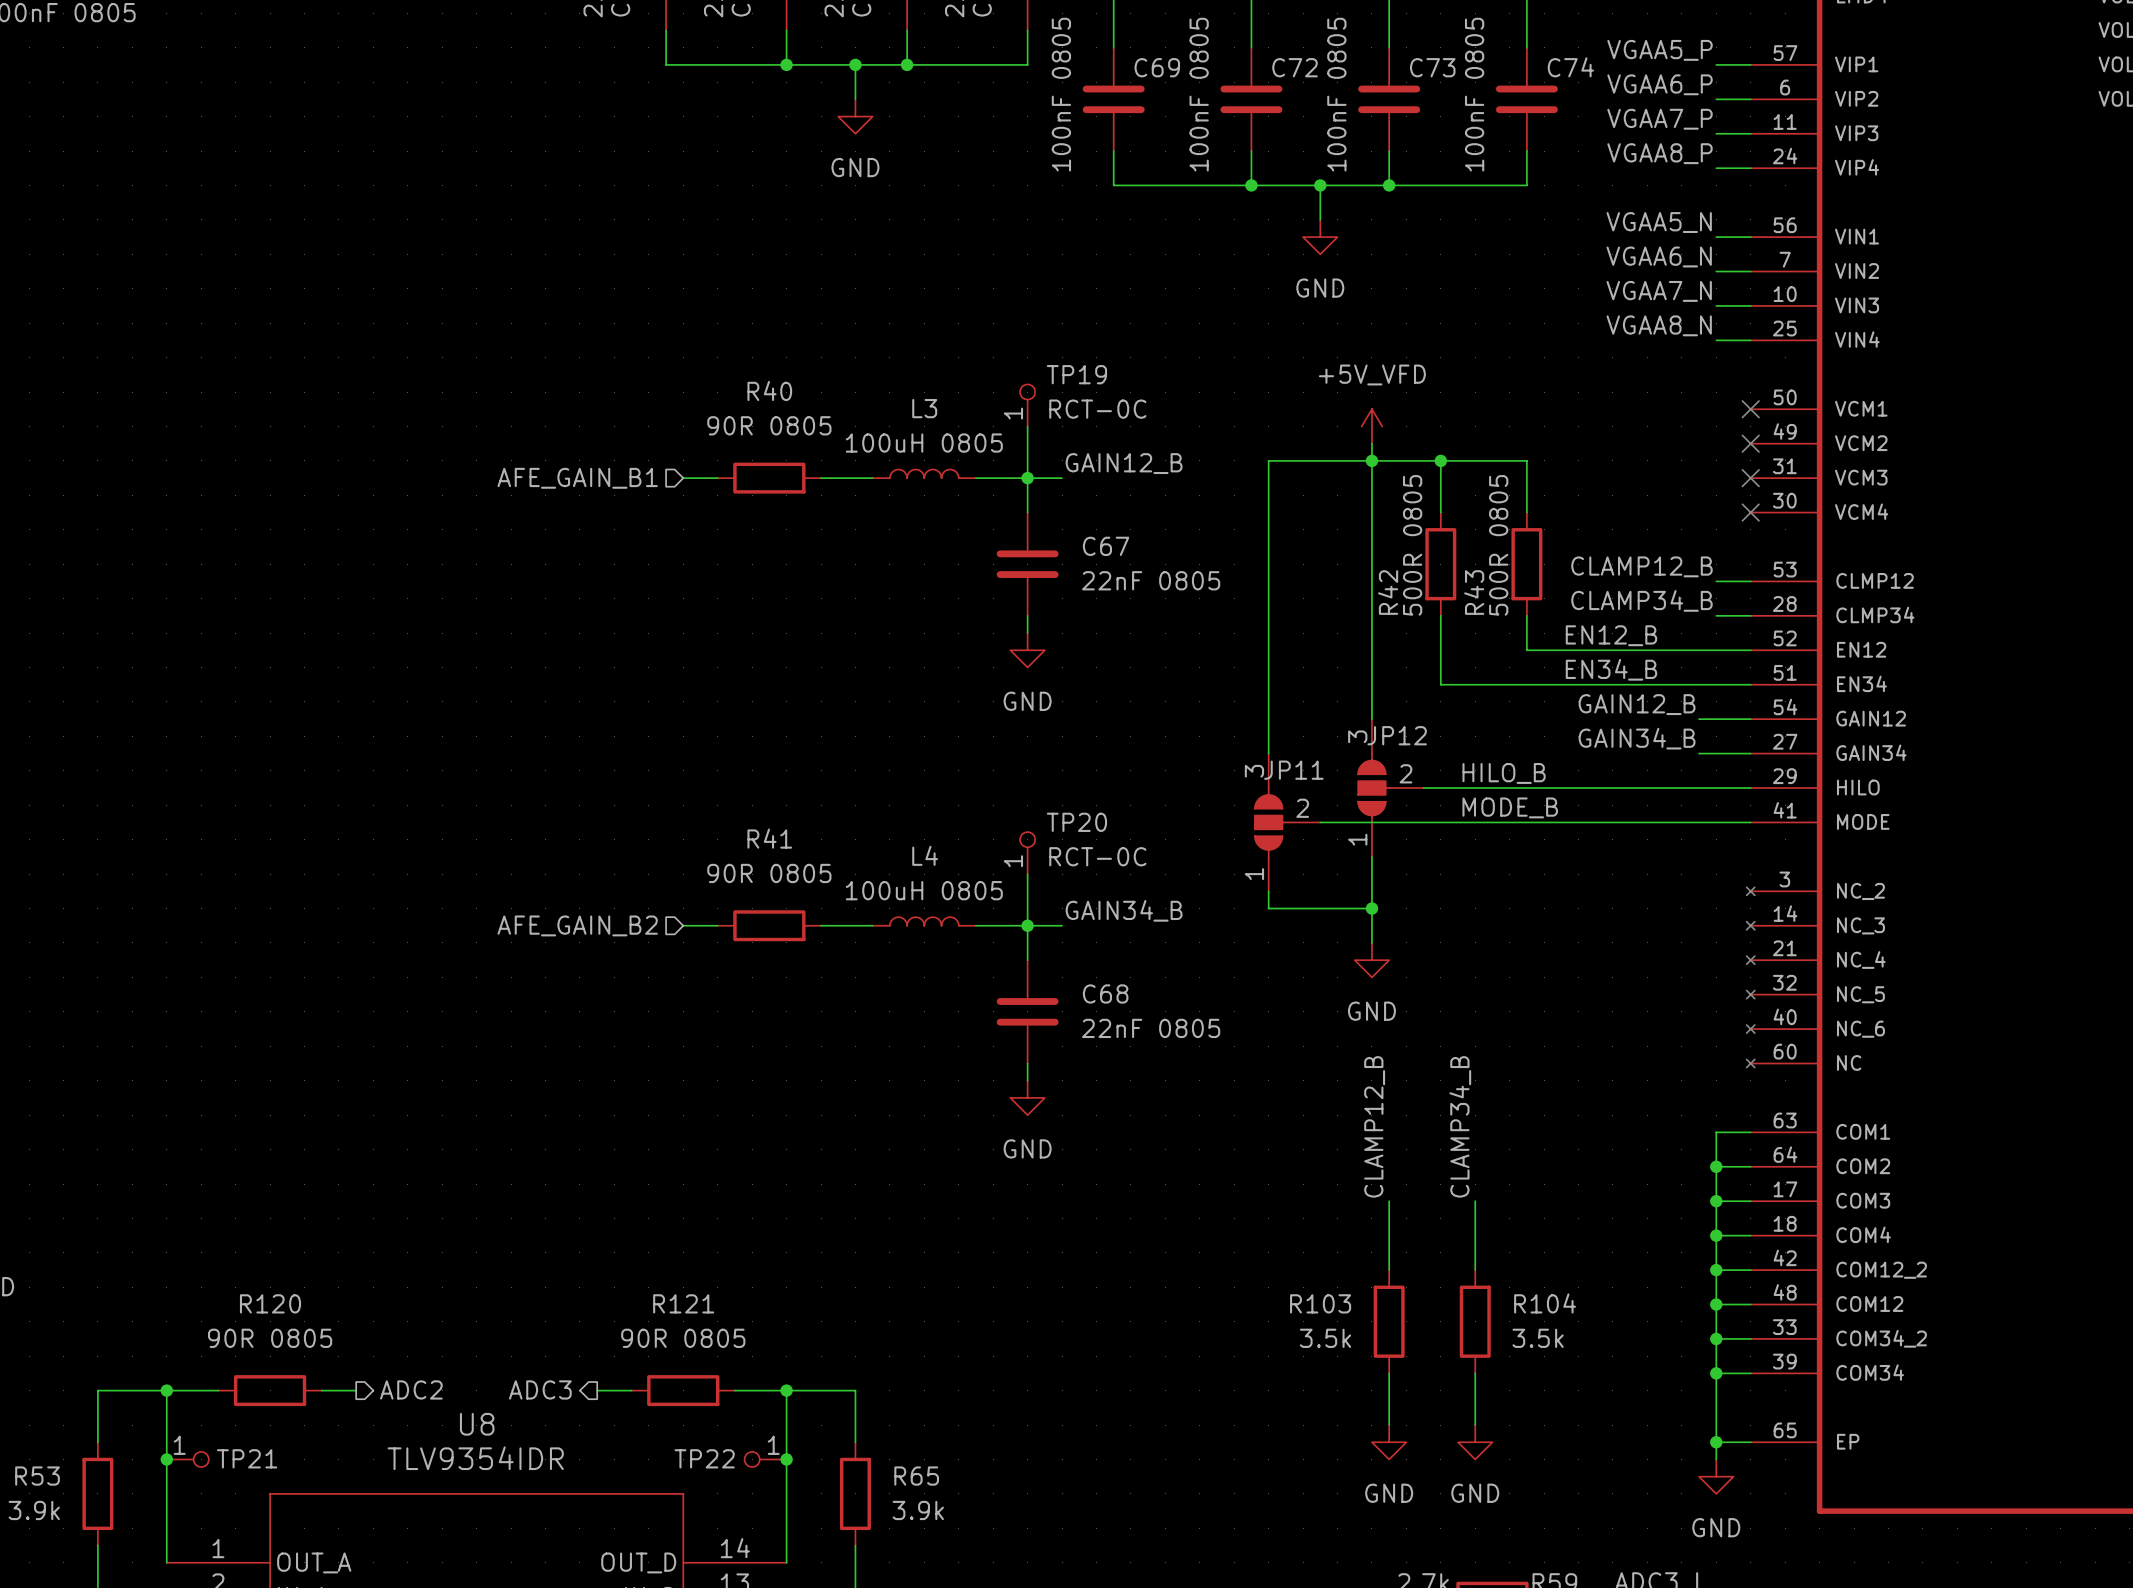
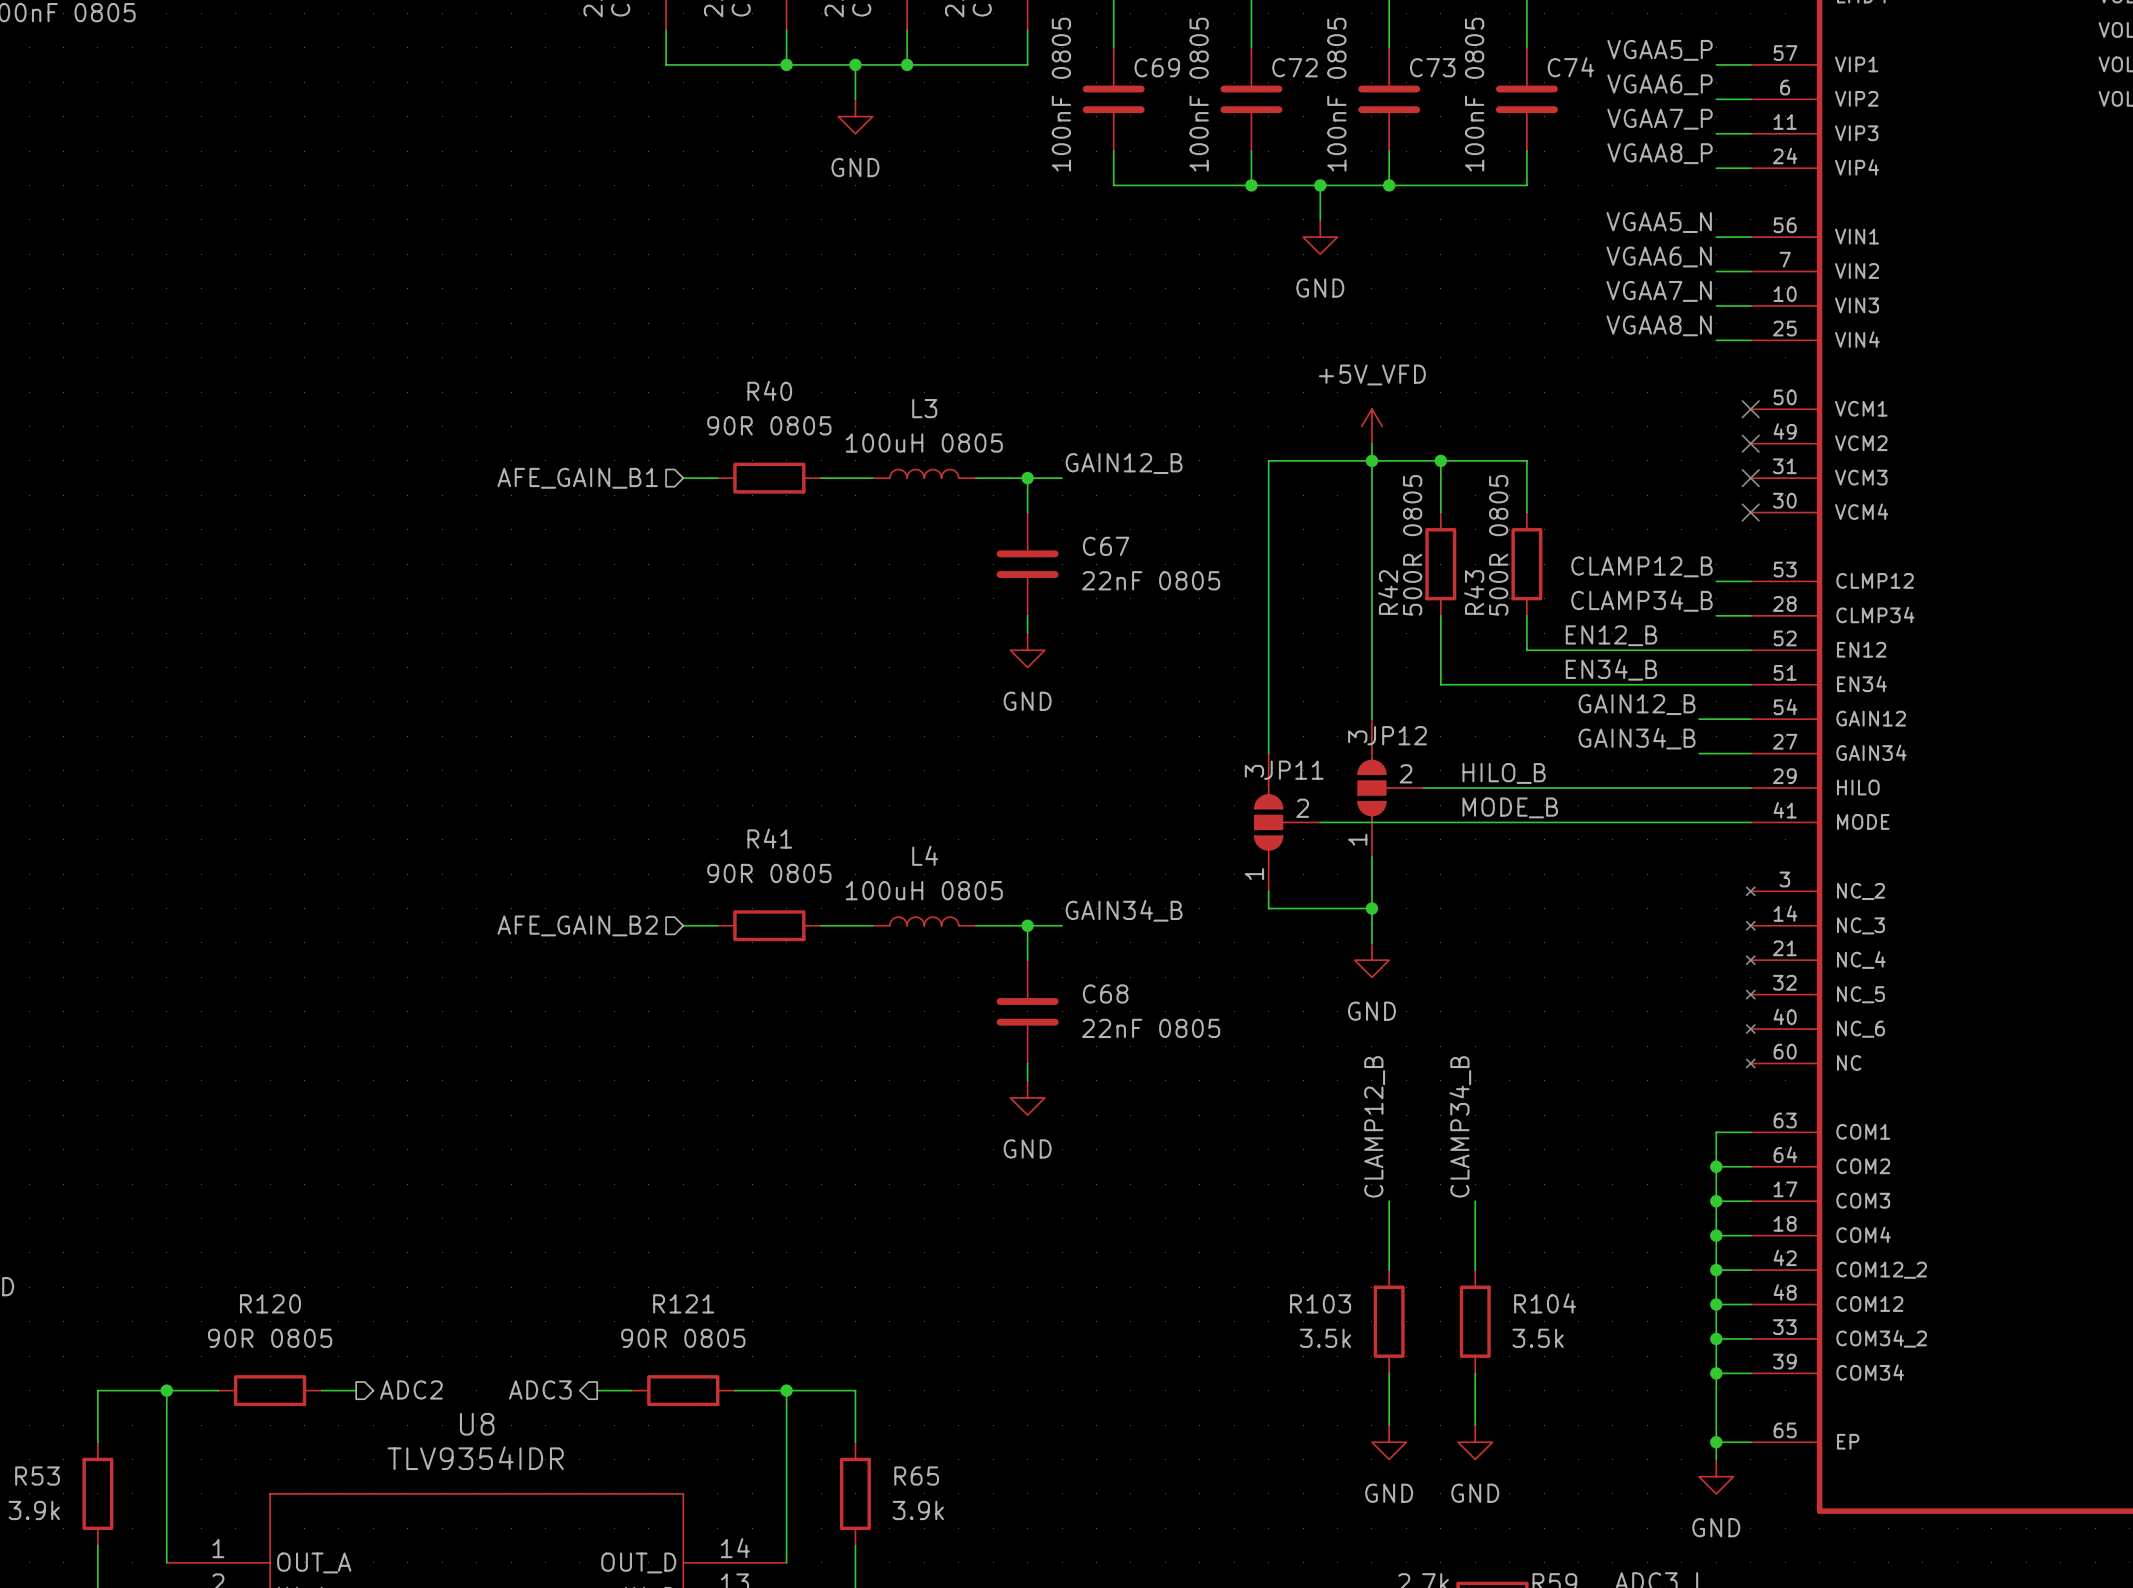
TP19: RCT-0C (1027, 405) -> none
wire: (1027, 426) (1027, 478) -> none
TP20: RCT-0C (1027, 853) -> none
wire: (1027, 874) (1027, 925) -> none
junction: (166, 1459) -> none
TP21: (187, 1459) -> none
TP22: (765, 1459) -> none
junction: (786, 1459) -> none

